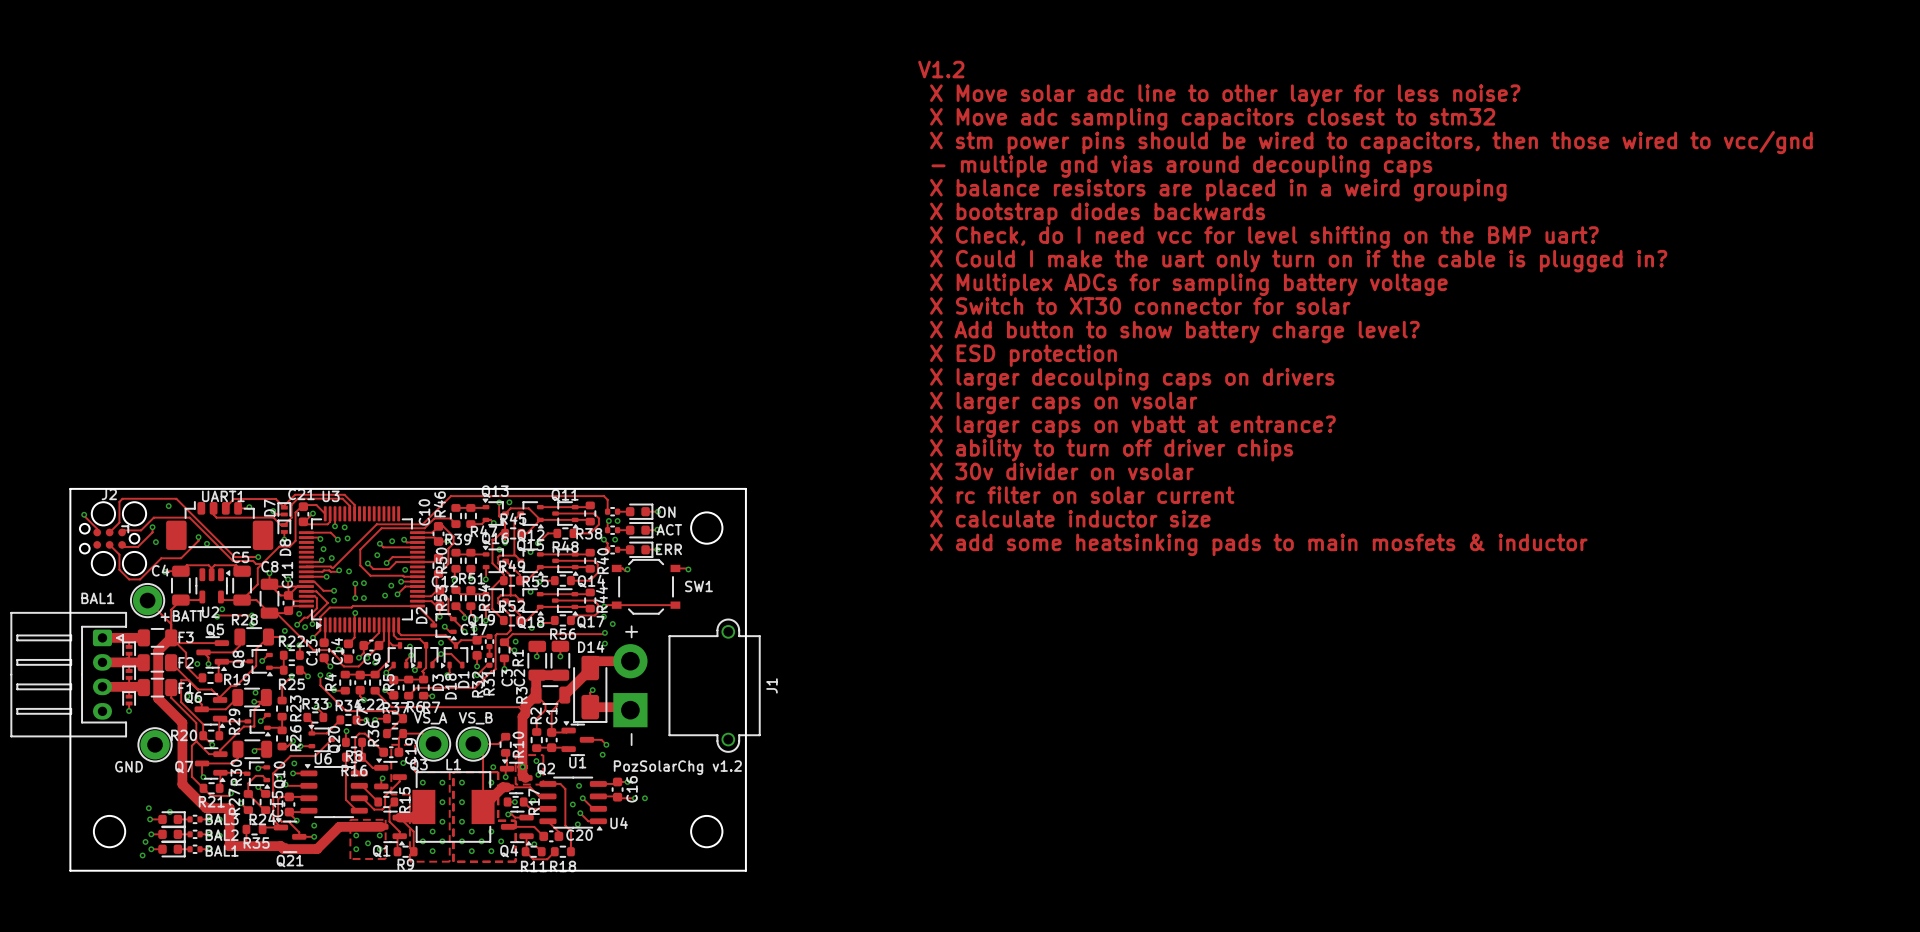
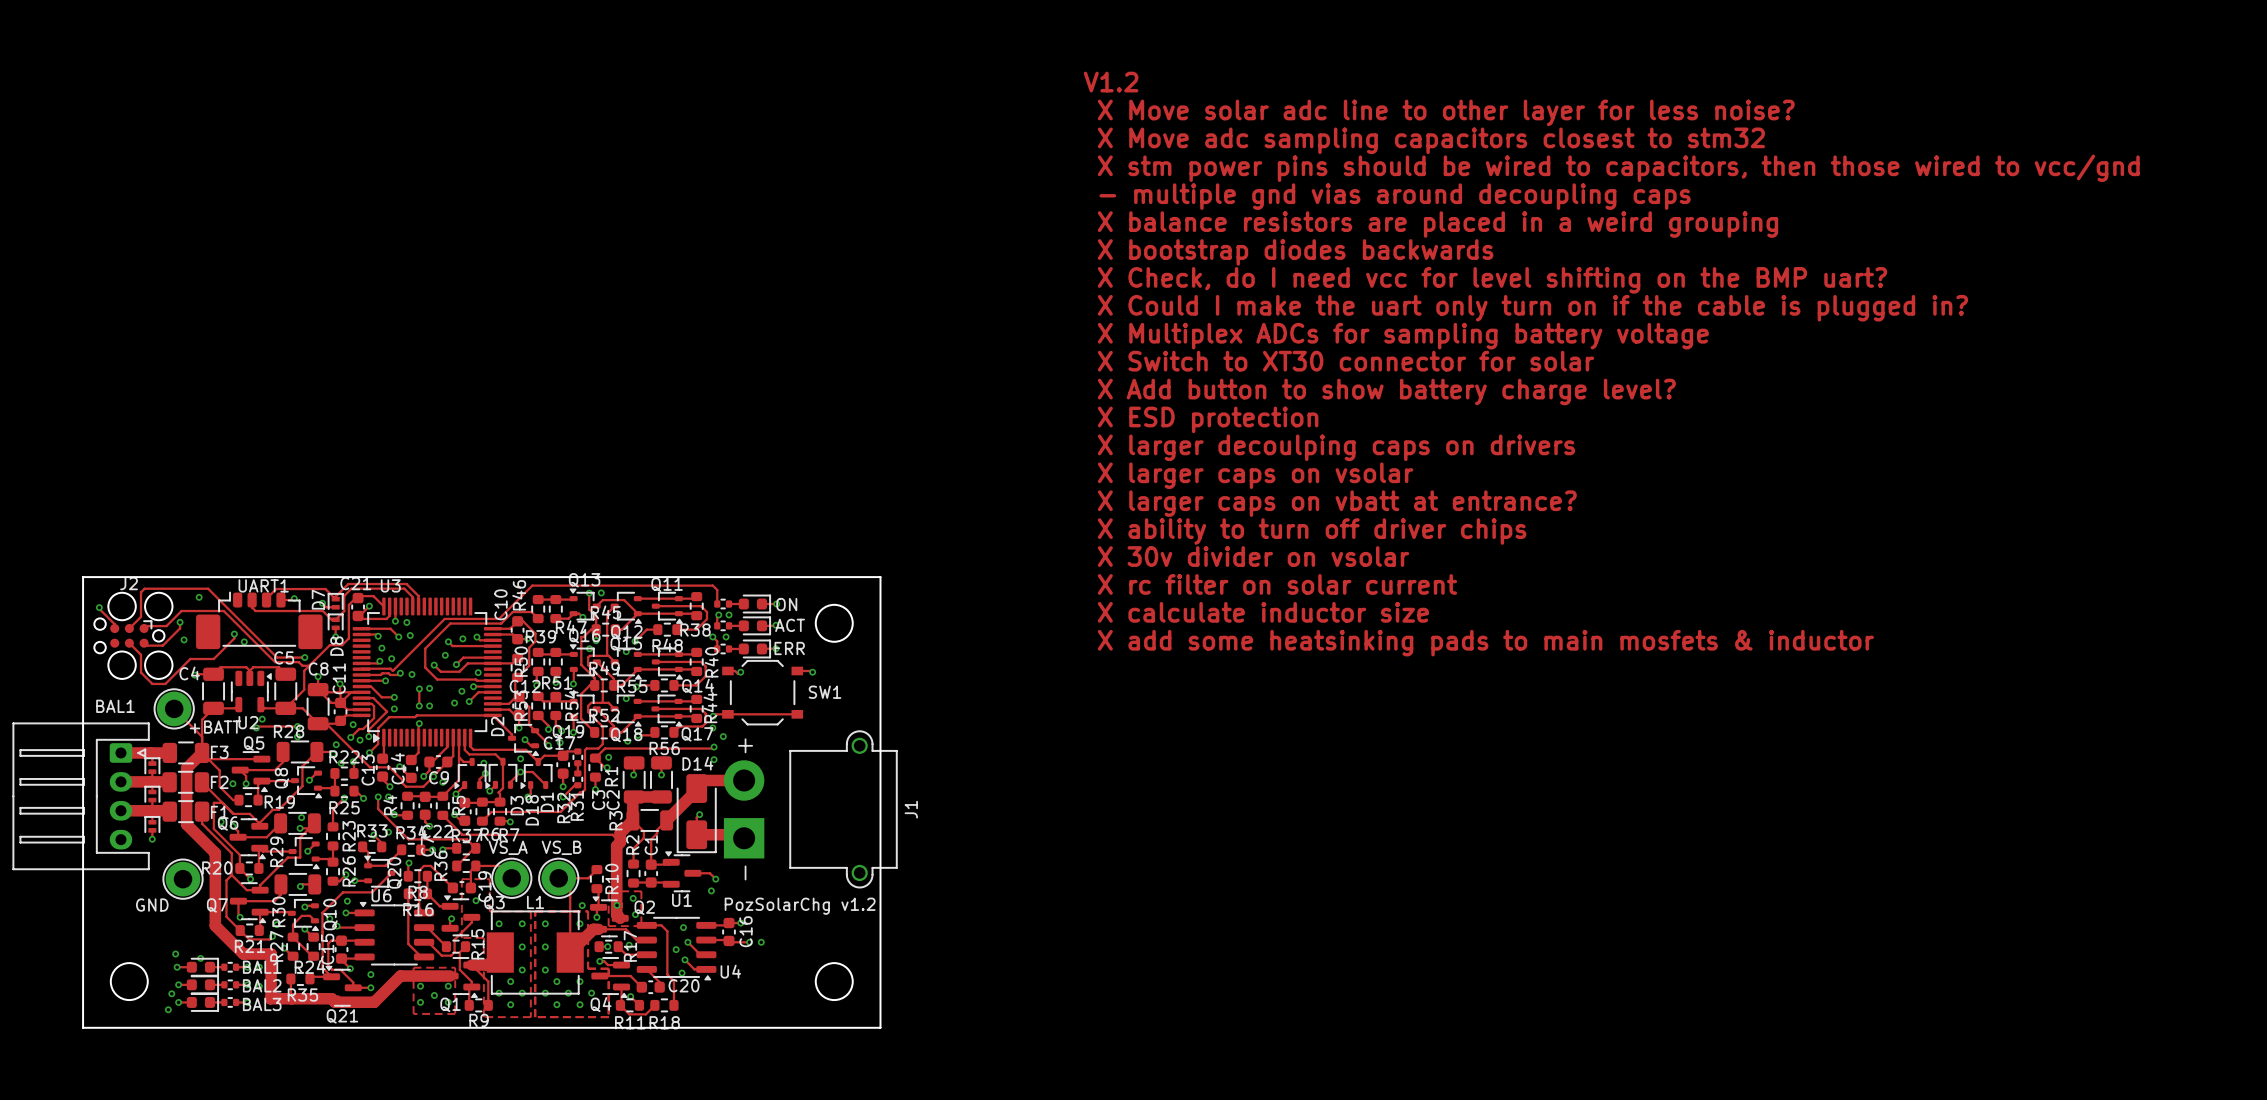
text: BAL3 (222, 819) -> BAL1 (262, 967)
text: BAL1 (222, 850) -> BAL3 (262, 1004)

